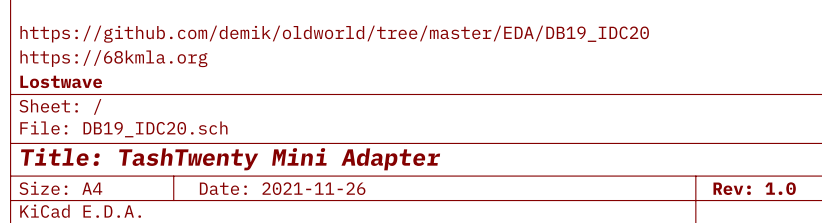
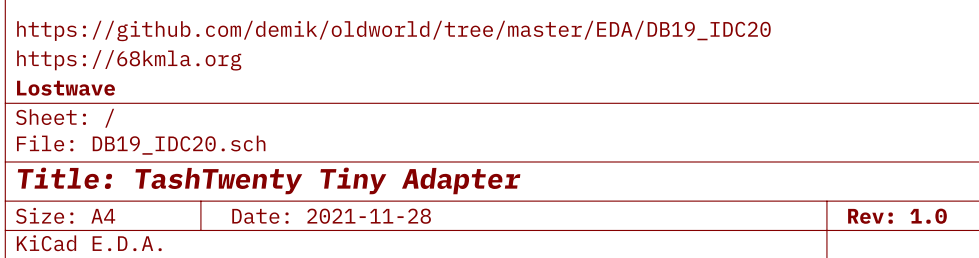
title block: Title: TashTwenty Mini Adapter (230, 159) -> Title: TashTwenty Tiny Adapter (269, 180)
title block: Date: 2021-11-26 (282, 188) -> Date: 2021-11-28 (331, 216)

